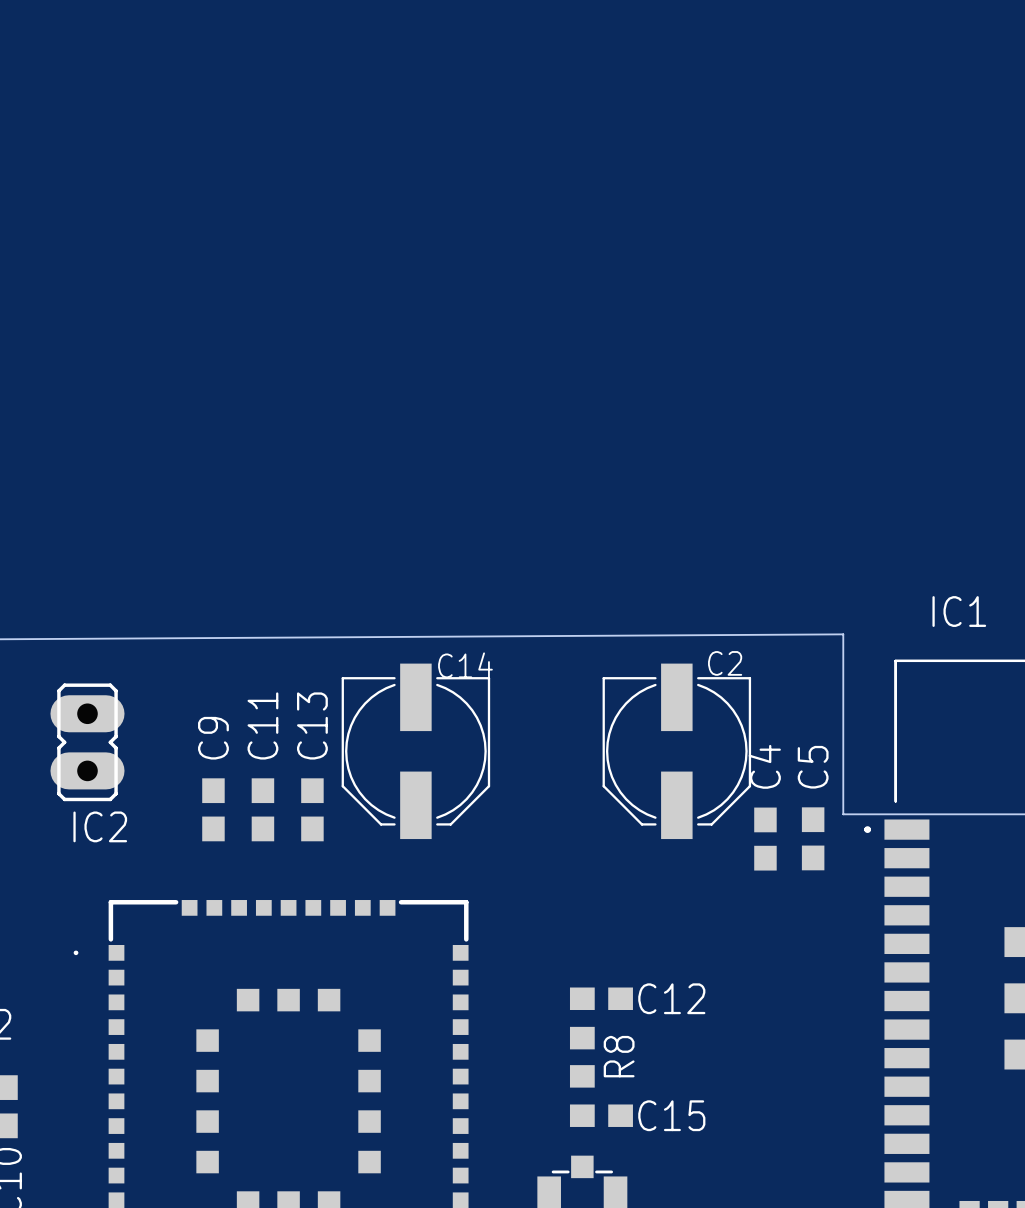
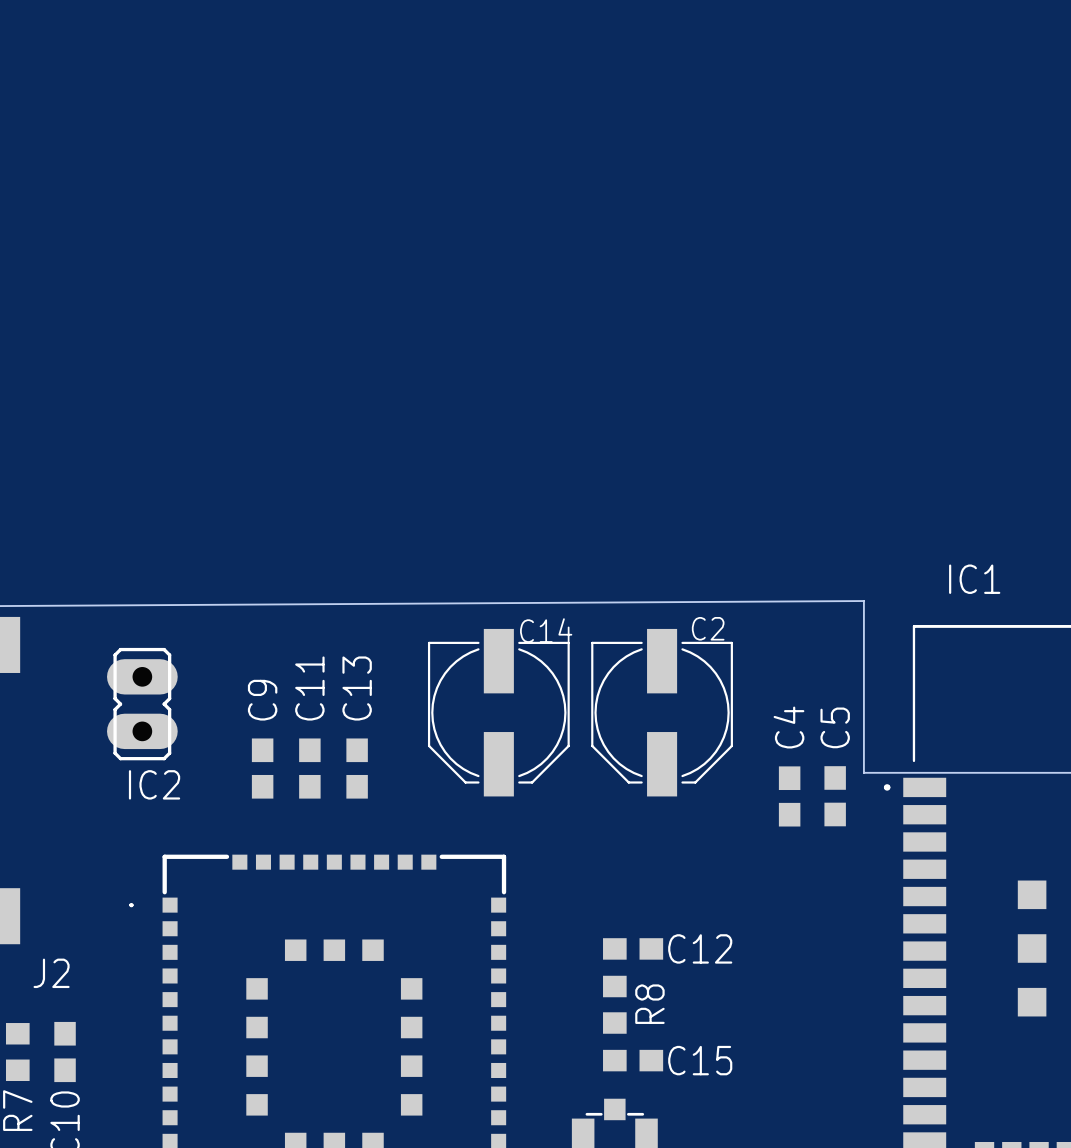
C14 position: (415, 751) -> (498, 712)
C2 position: (676, 751) -> (662, 712)

